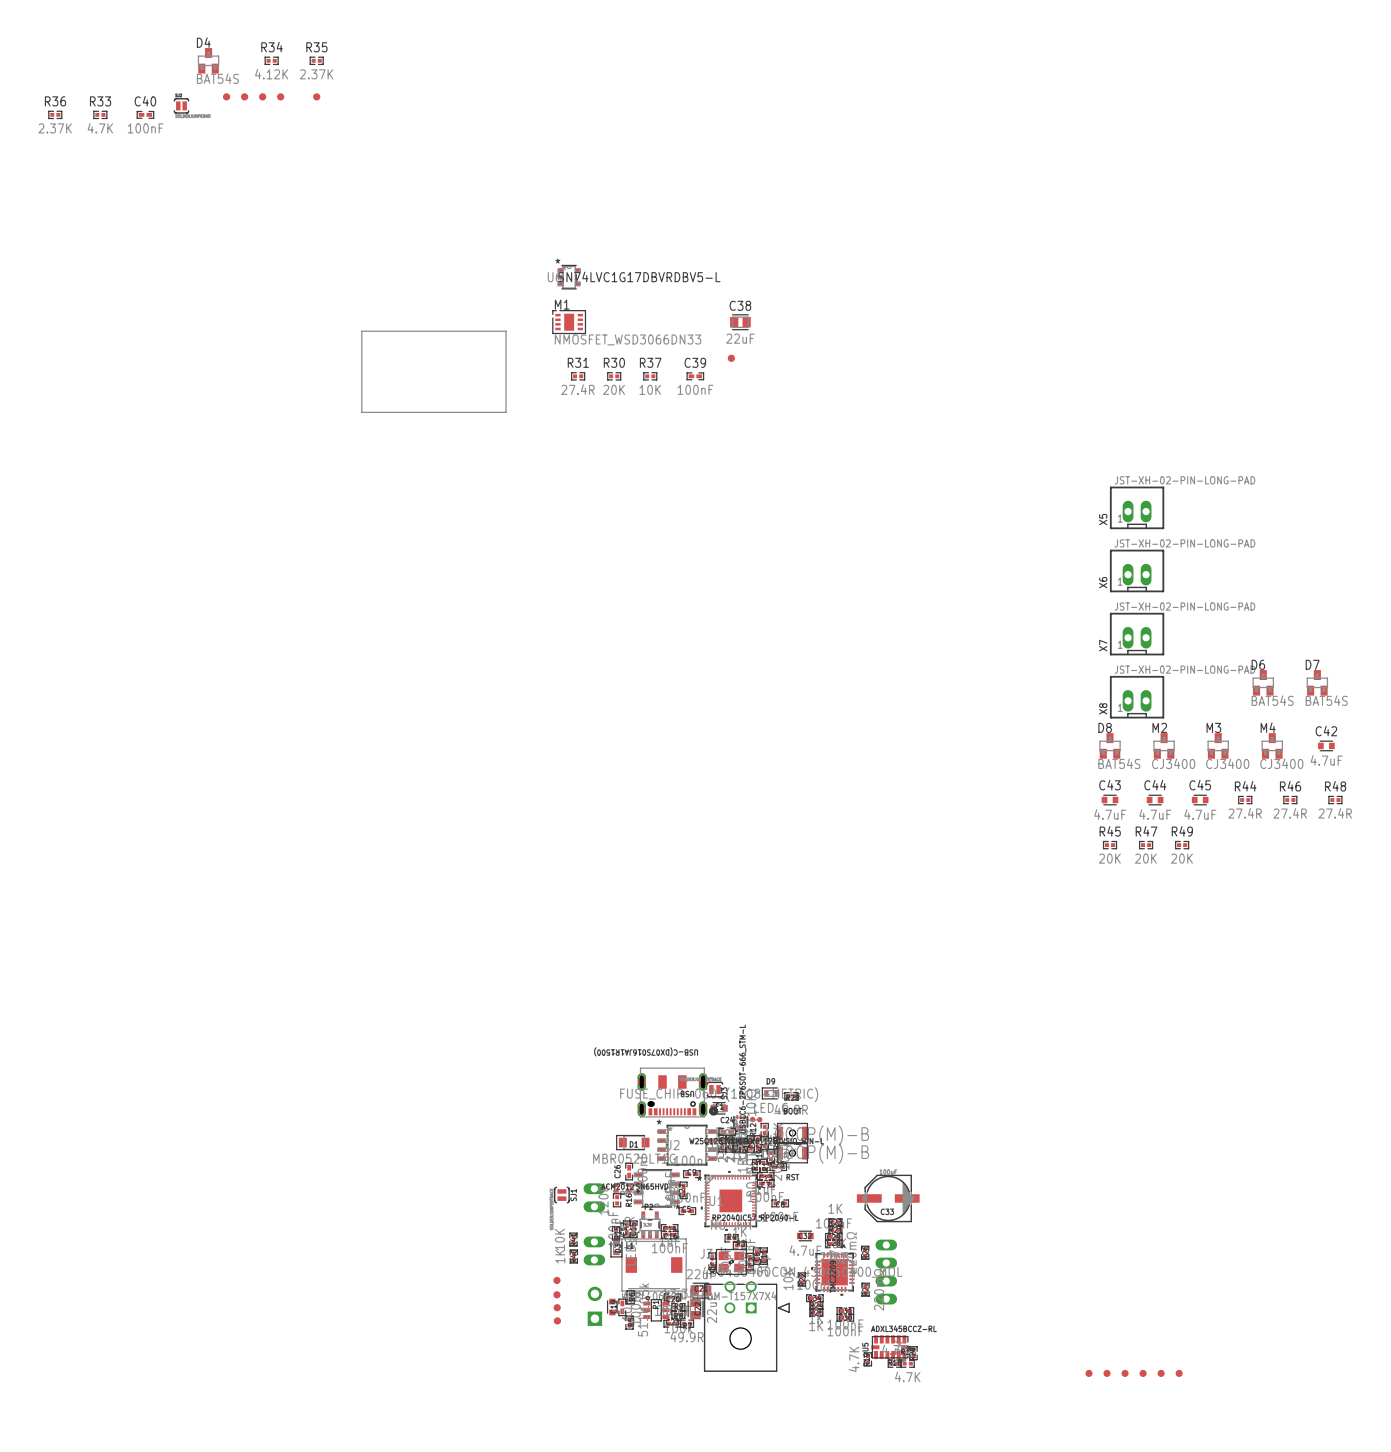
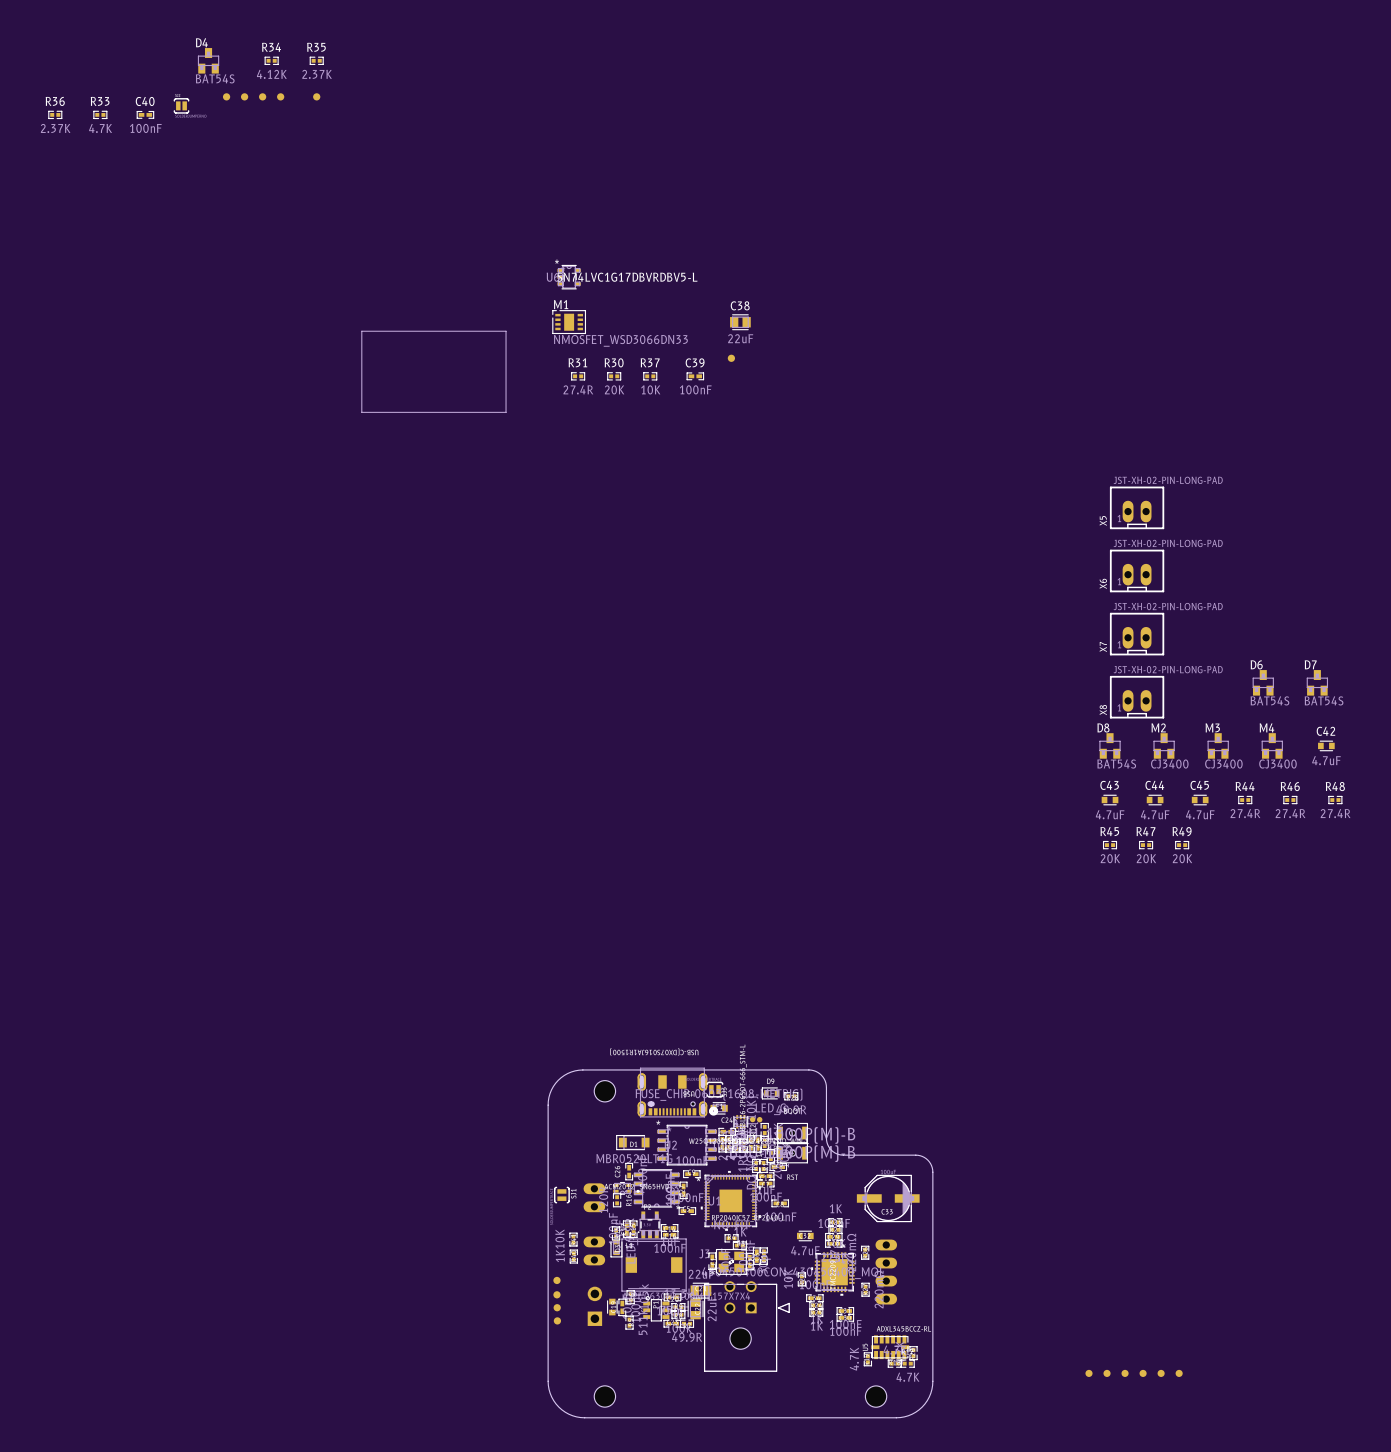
board edge: none -> (582, 1069) (813, 1070) (821, 1075) (825, 1082) (826, 1140) (833, 1151) (843, 1155) (918, 1155) (927, 1160) (932, 1172) (932, 1381) (929, 1397) (922, 1407) (912, 1414) (896, 1417) (584, 1417) (568, 1414) (558, 1407) (551, 1397) (548, 1381) (548, 1101) (551, 1089) (558, 1080) (571, 1071) (582, 1069)
hole: none -> (604, 1091)
hole: none -> (604, 1396)
hole: none -> (876, 1396)

